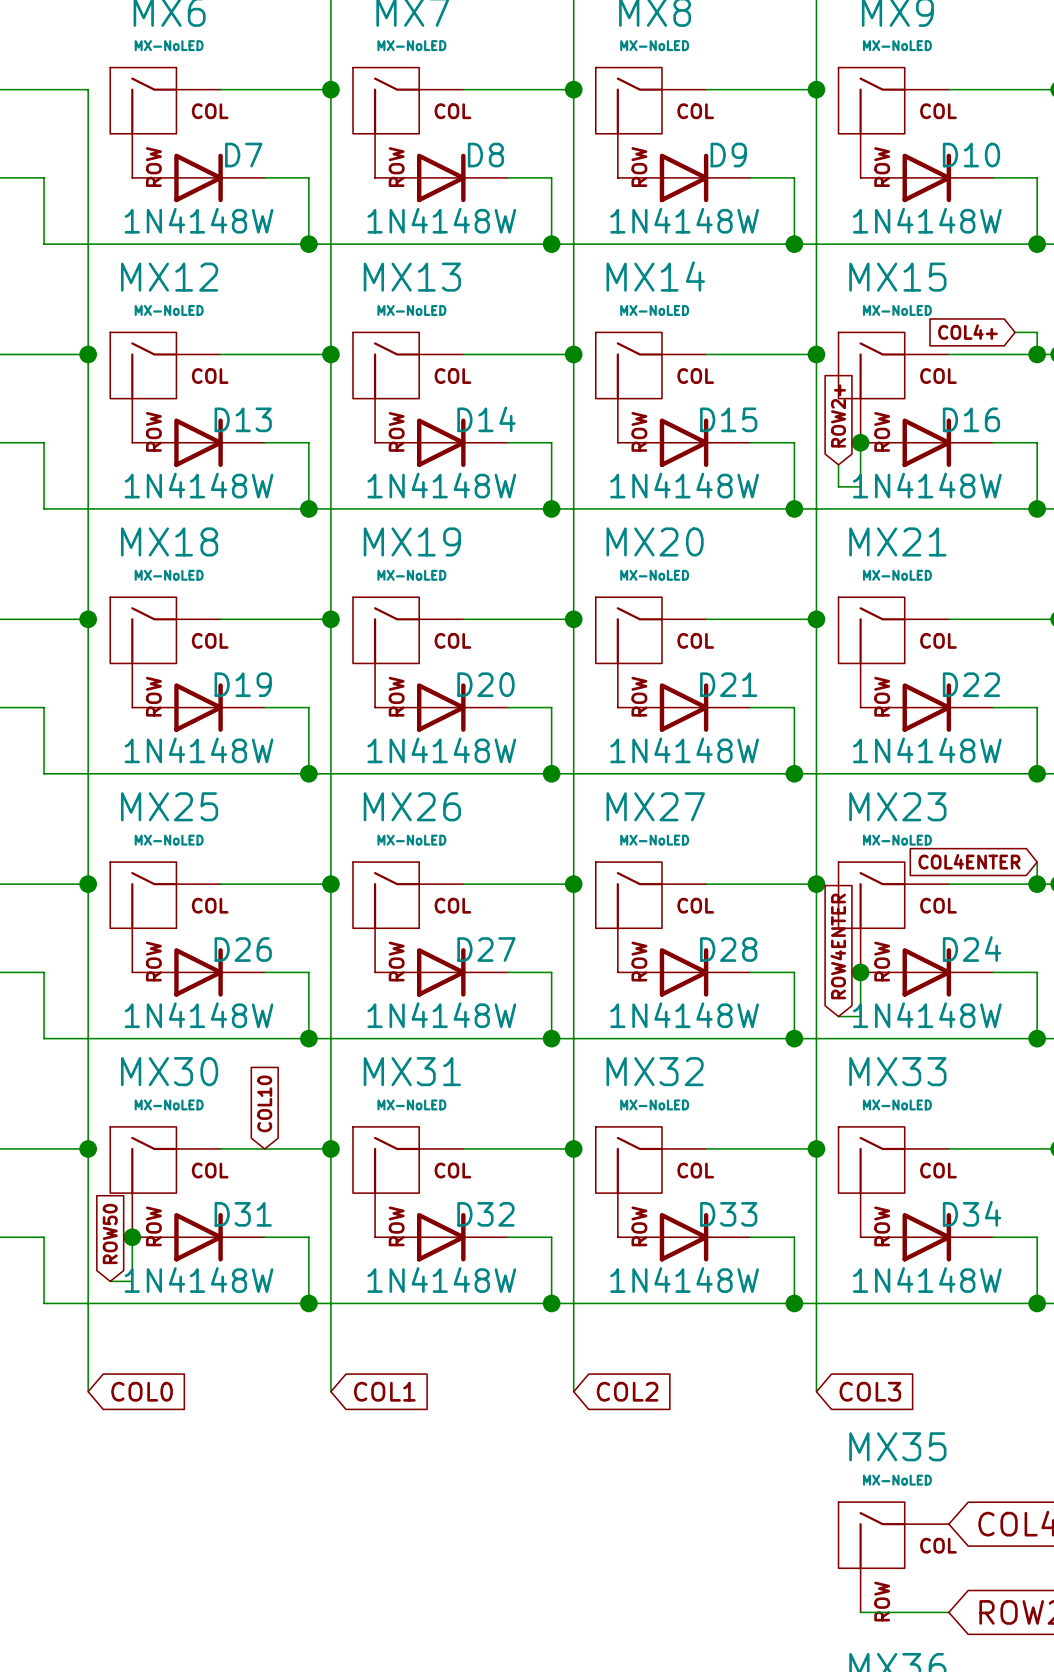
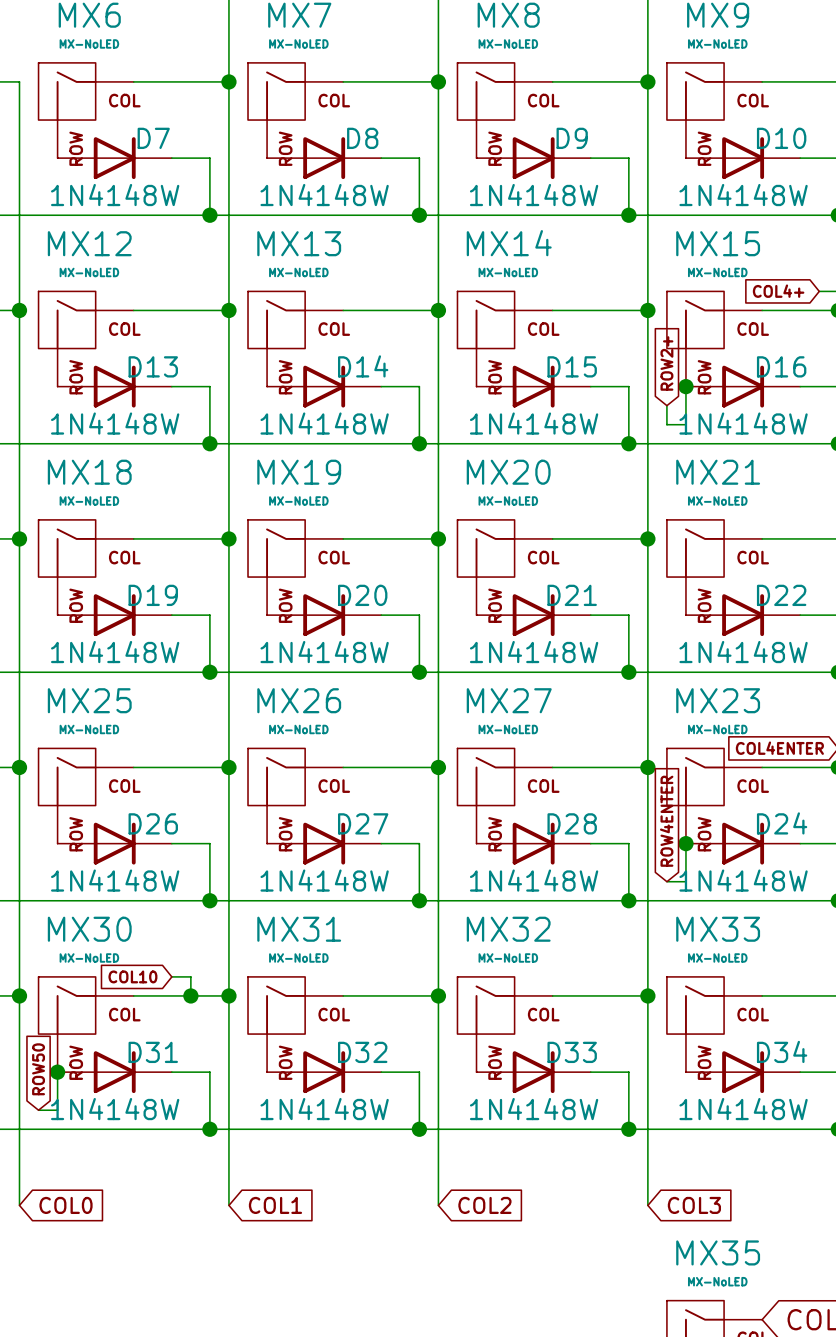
global label rotation: 0° (264, 1103) -> 90° counterclockwise (132, 976)
wire: none -> (171, 976) (190, 976) (190, 995)
junction: none -> (190, 995)

